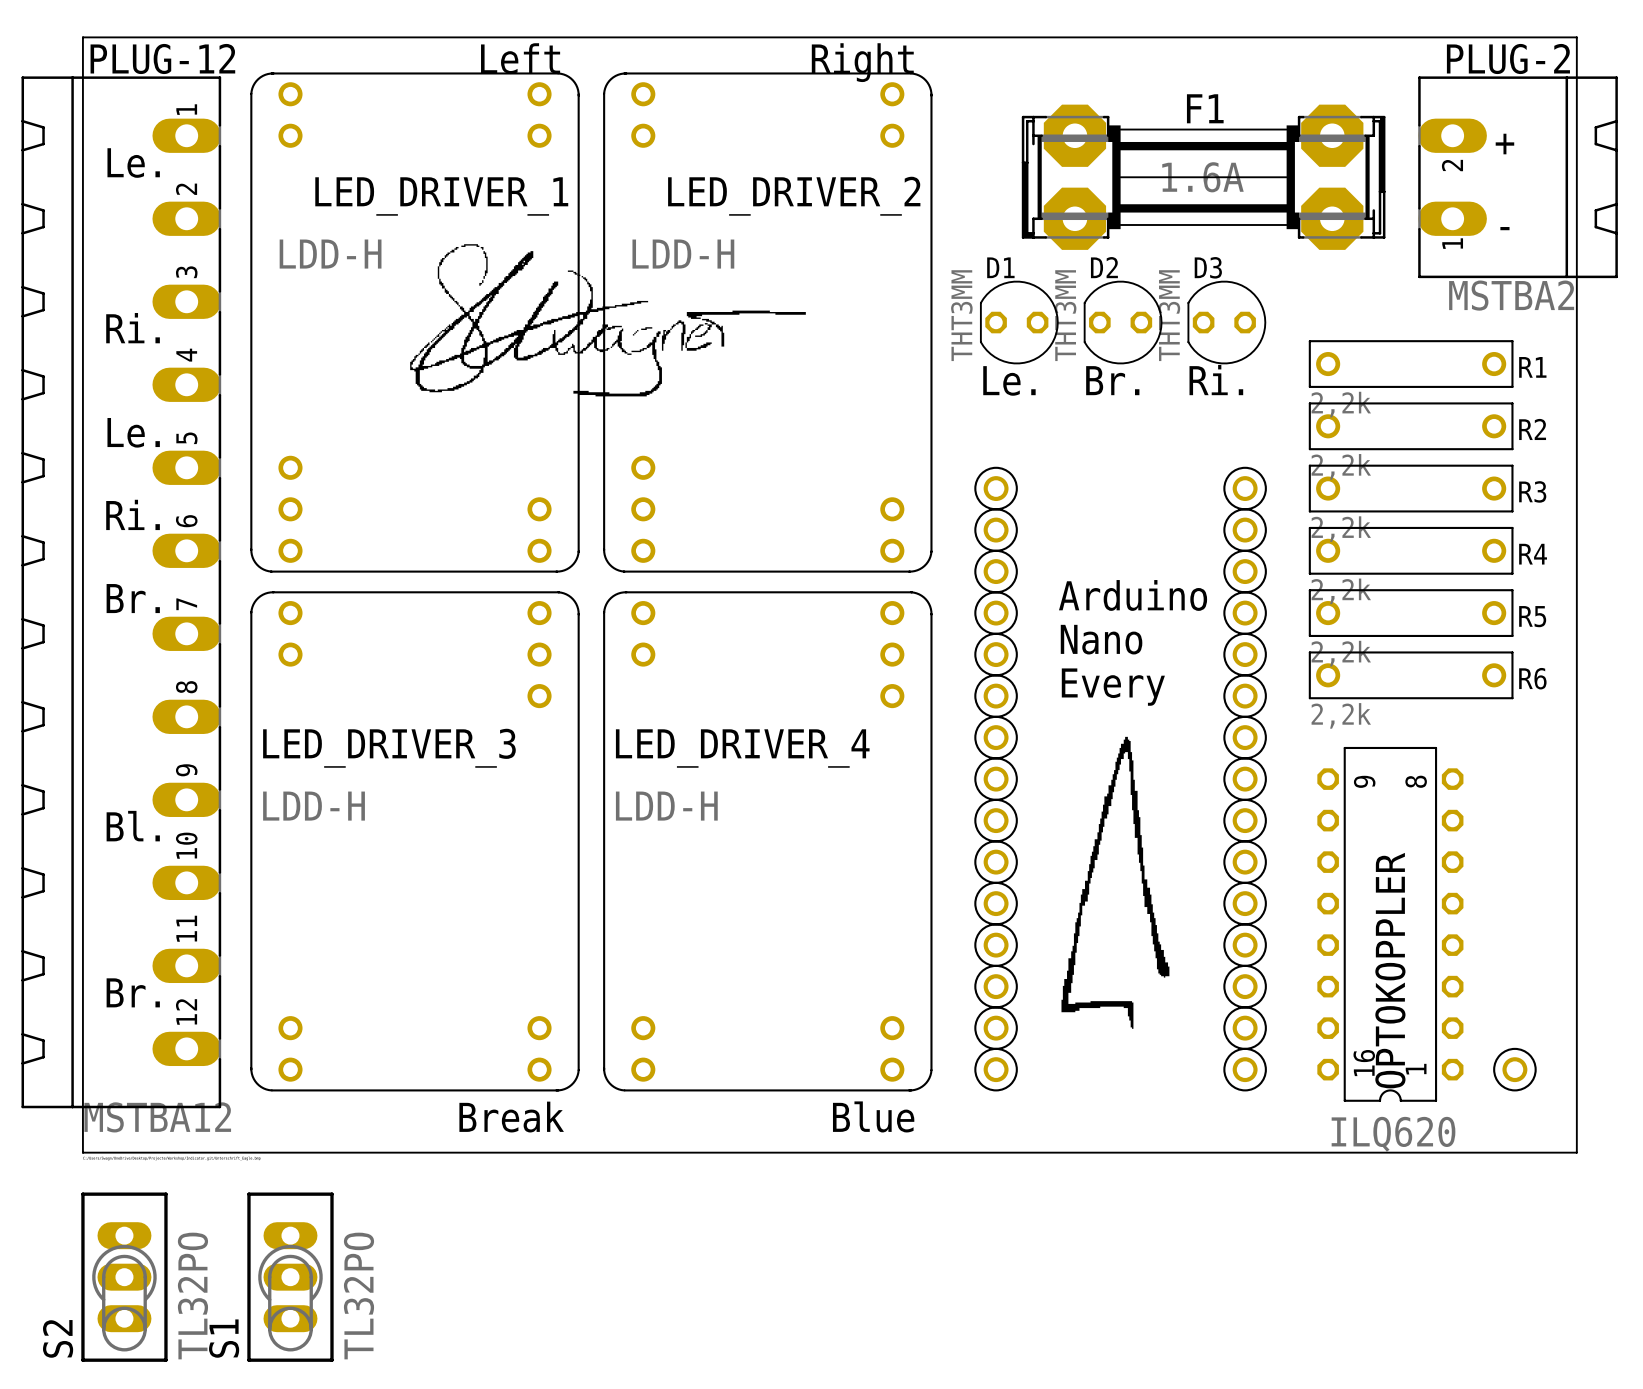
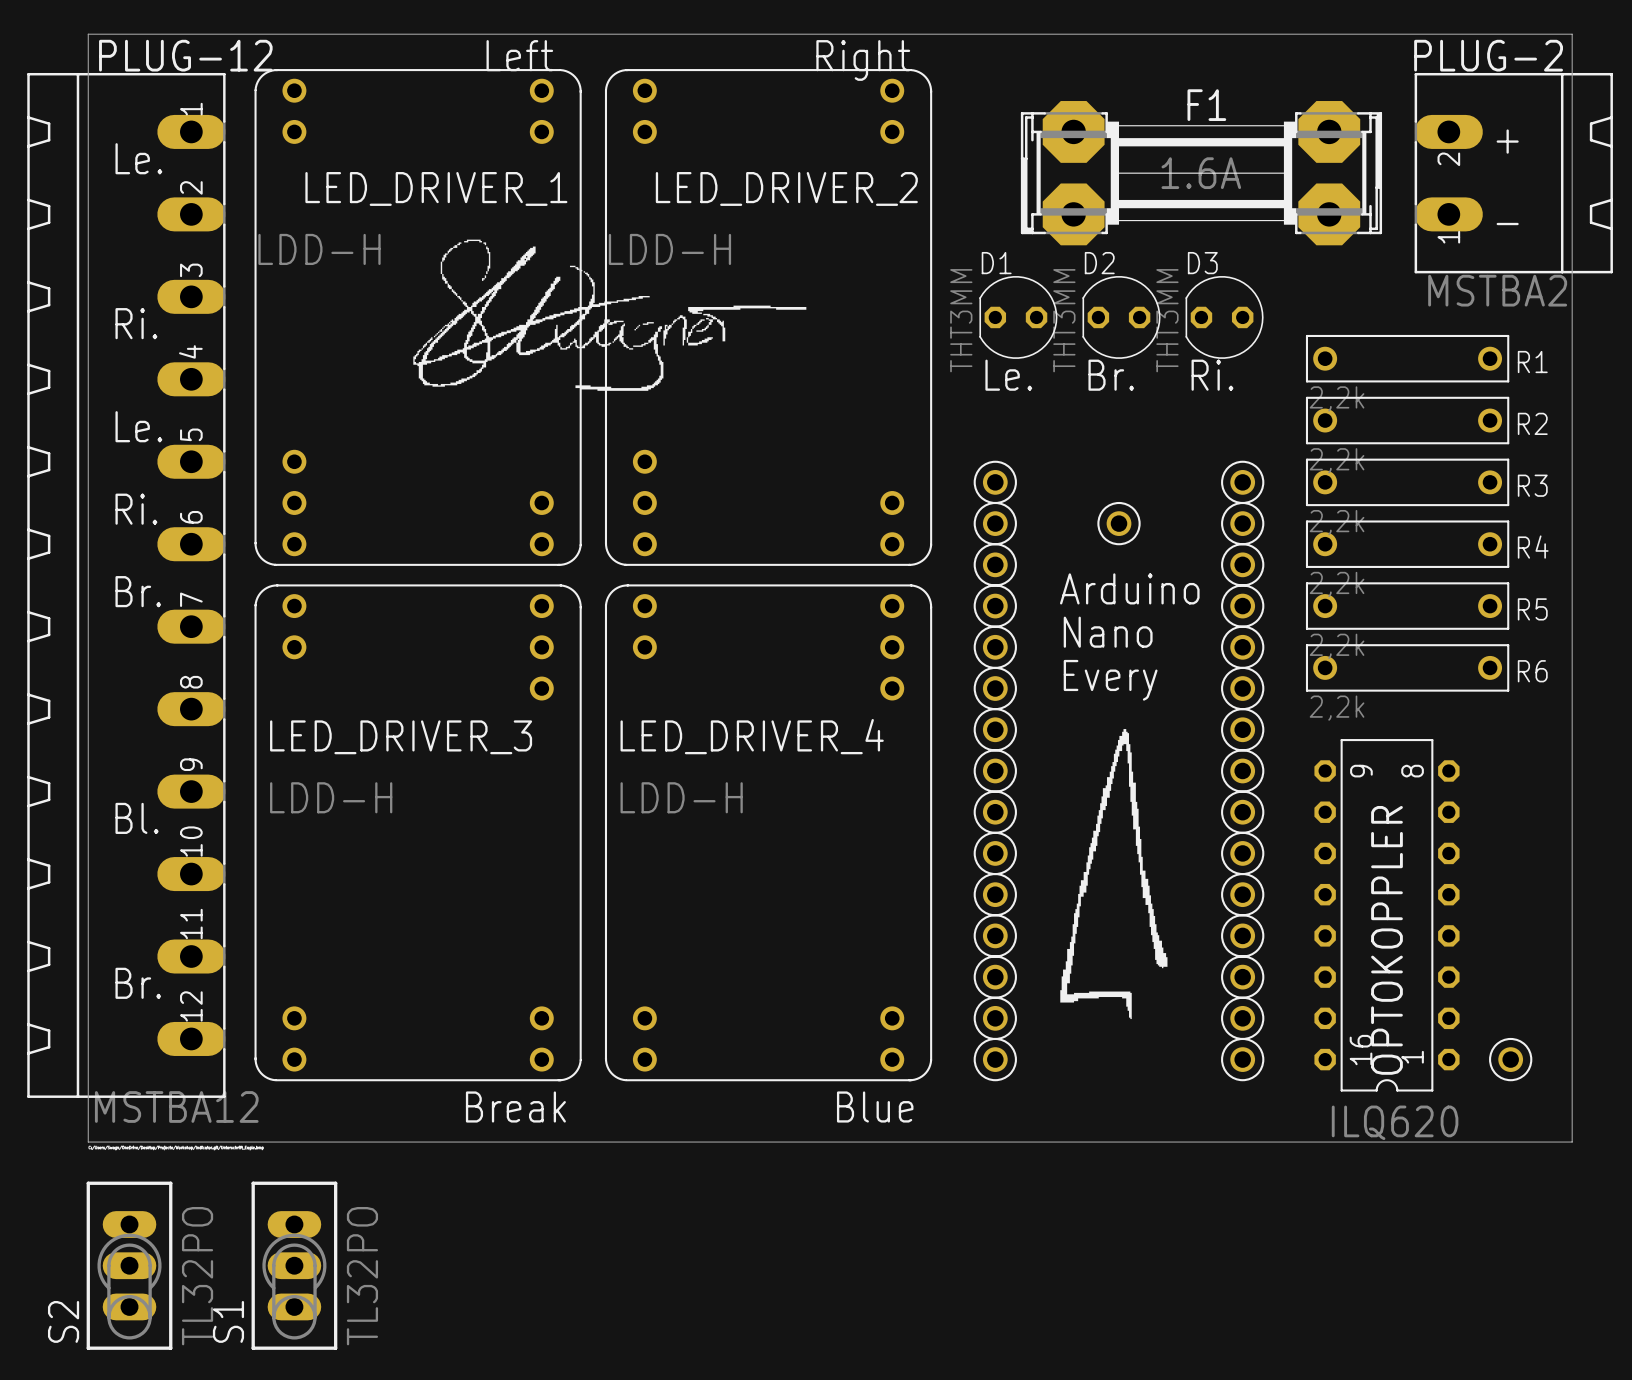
part: none -> (1119, 523)

